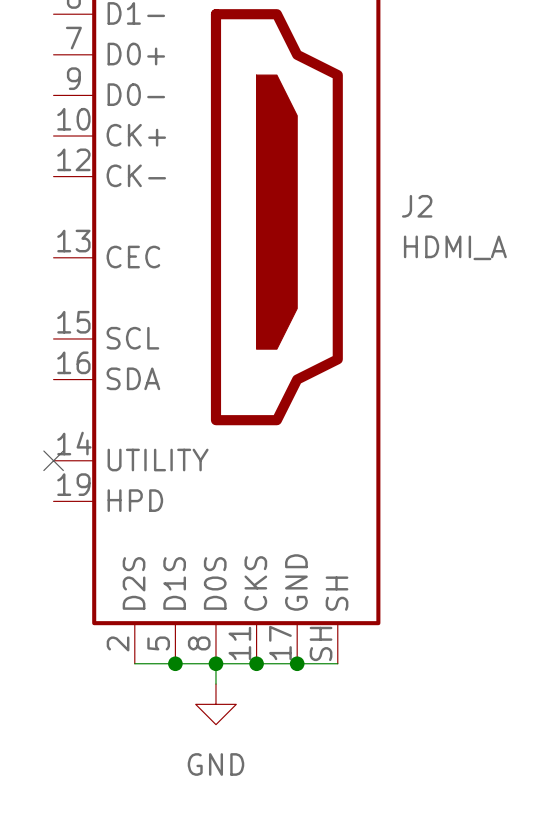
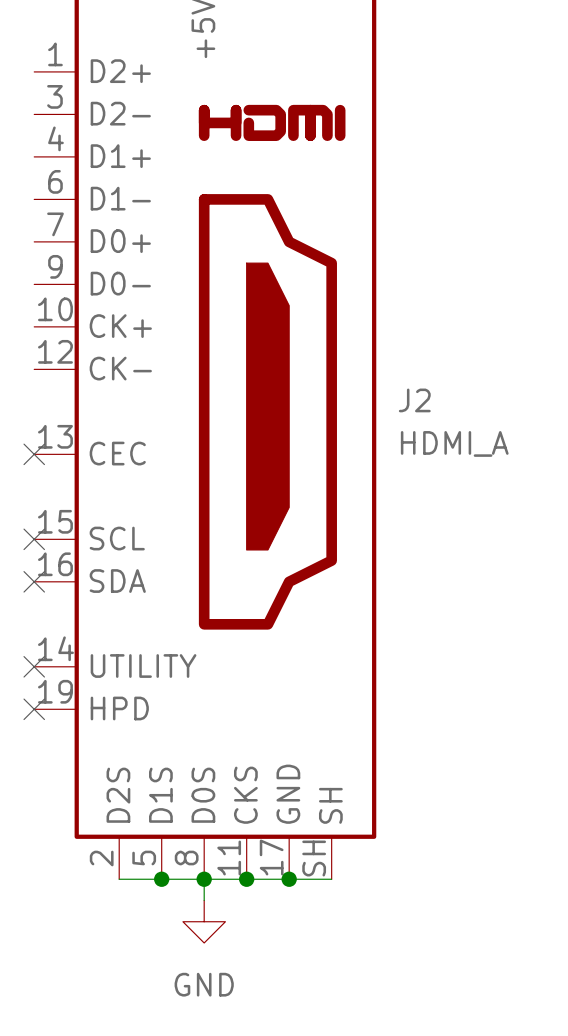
no-connect mark: none -> (34, 454)
no-connect mark: none -> (34, 539)
no-connect mark: none -> (34, 581)
no-connect mark: none -> (34, 709)

